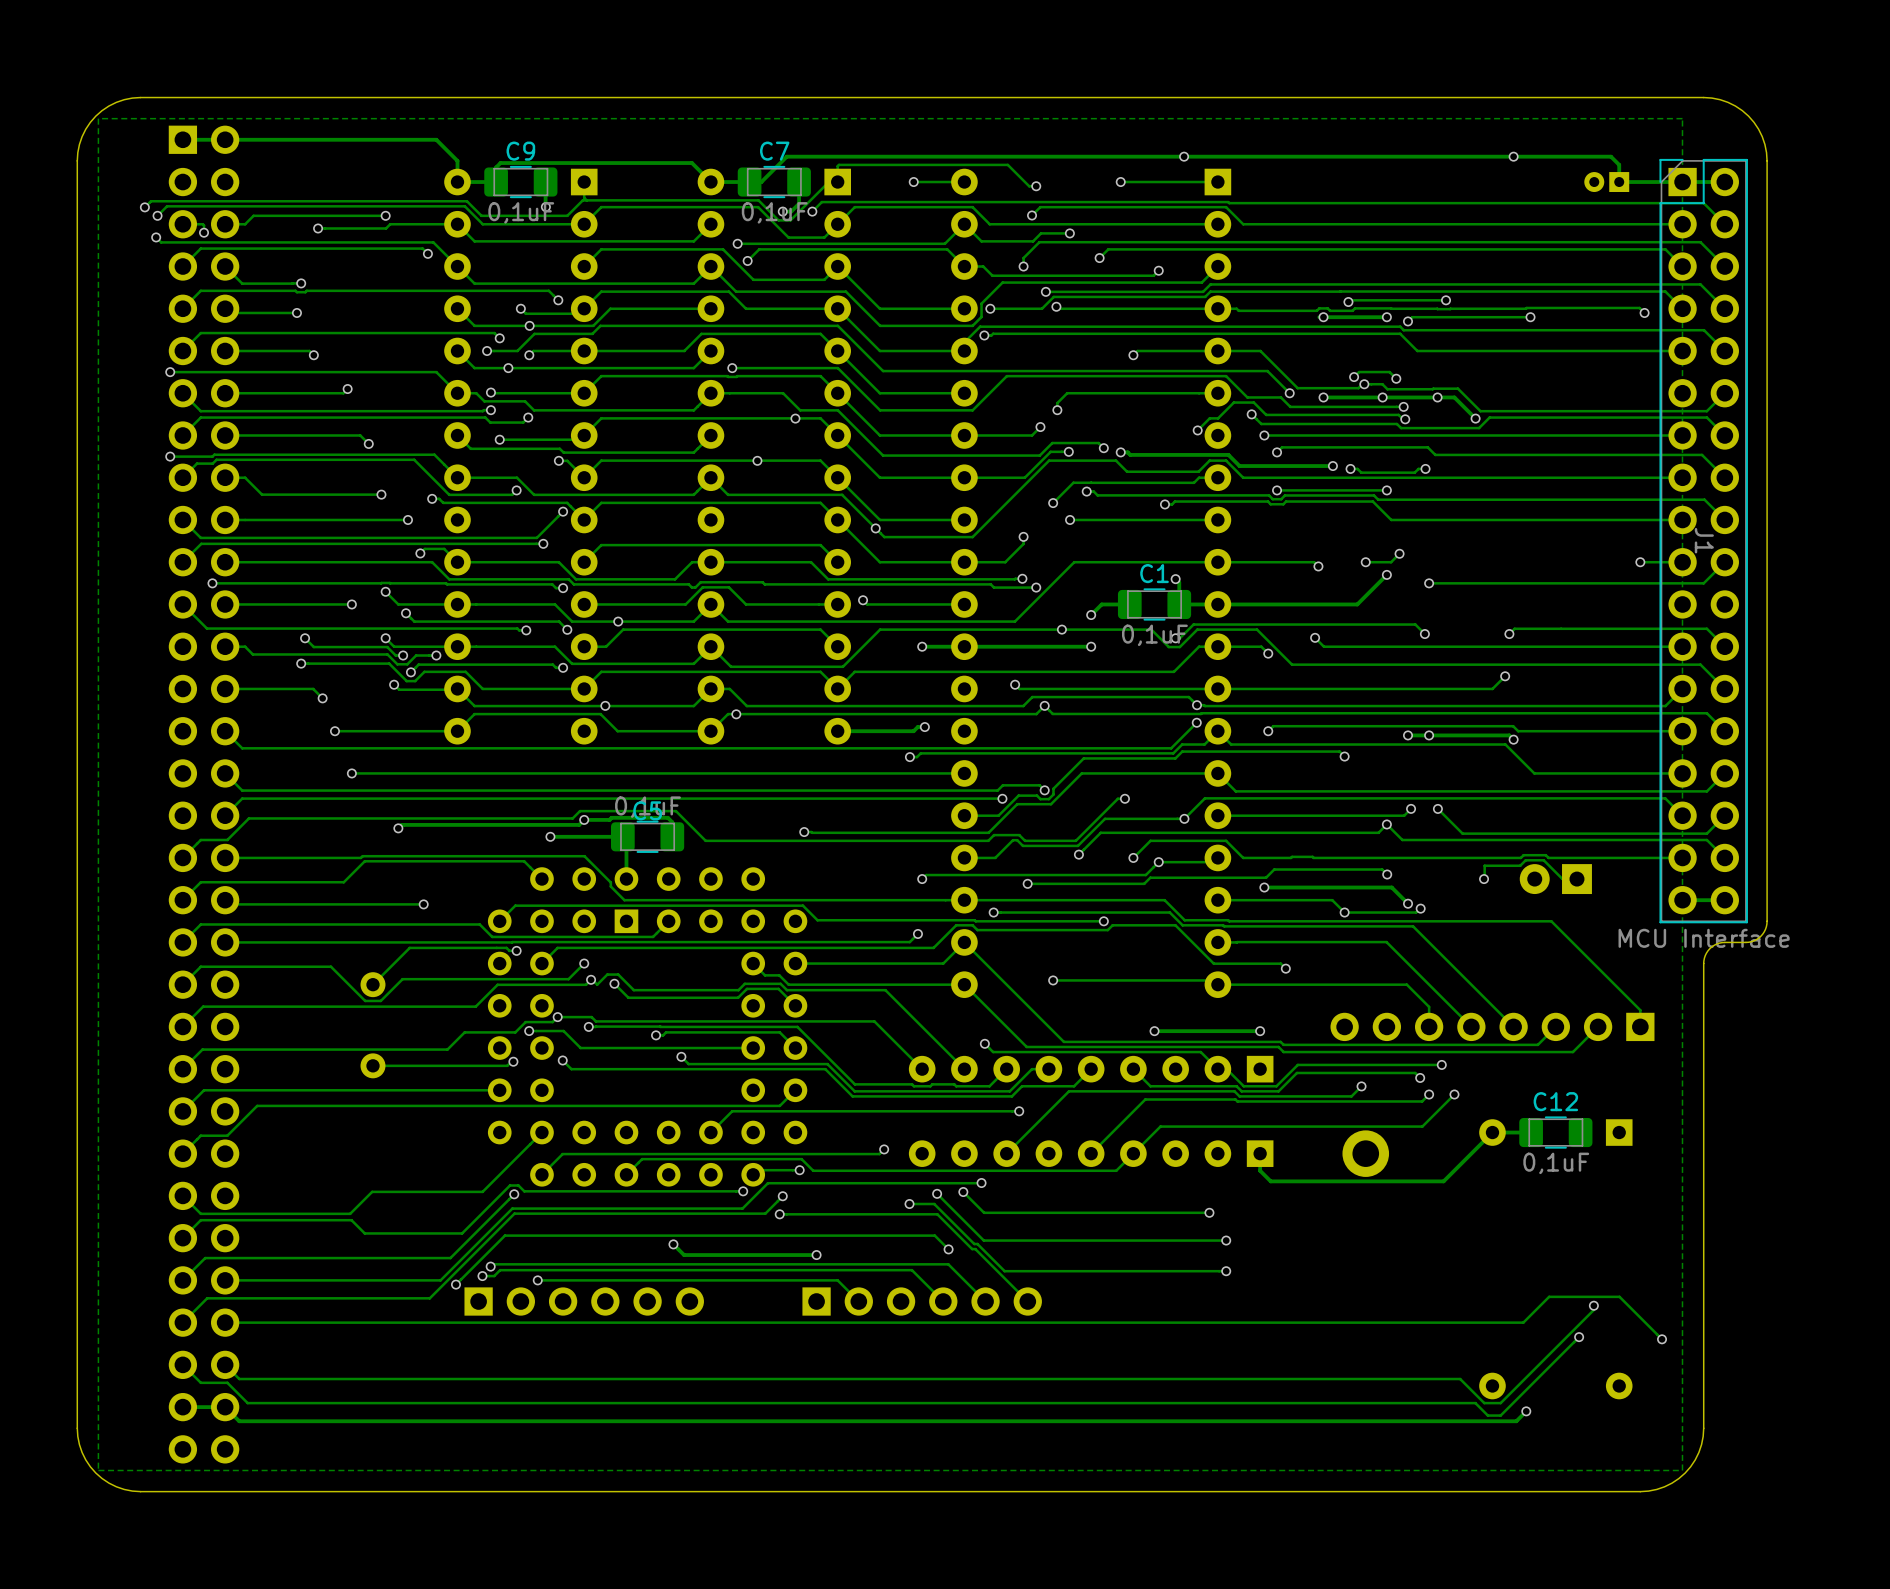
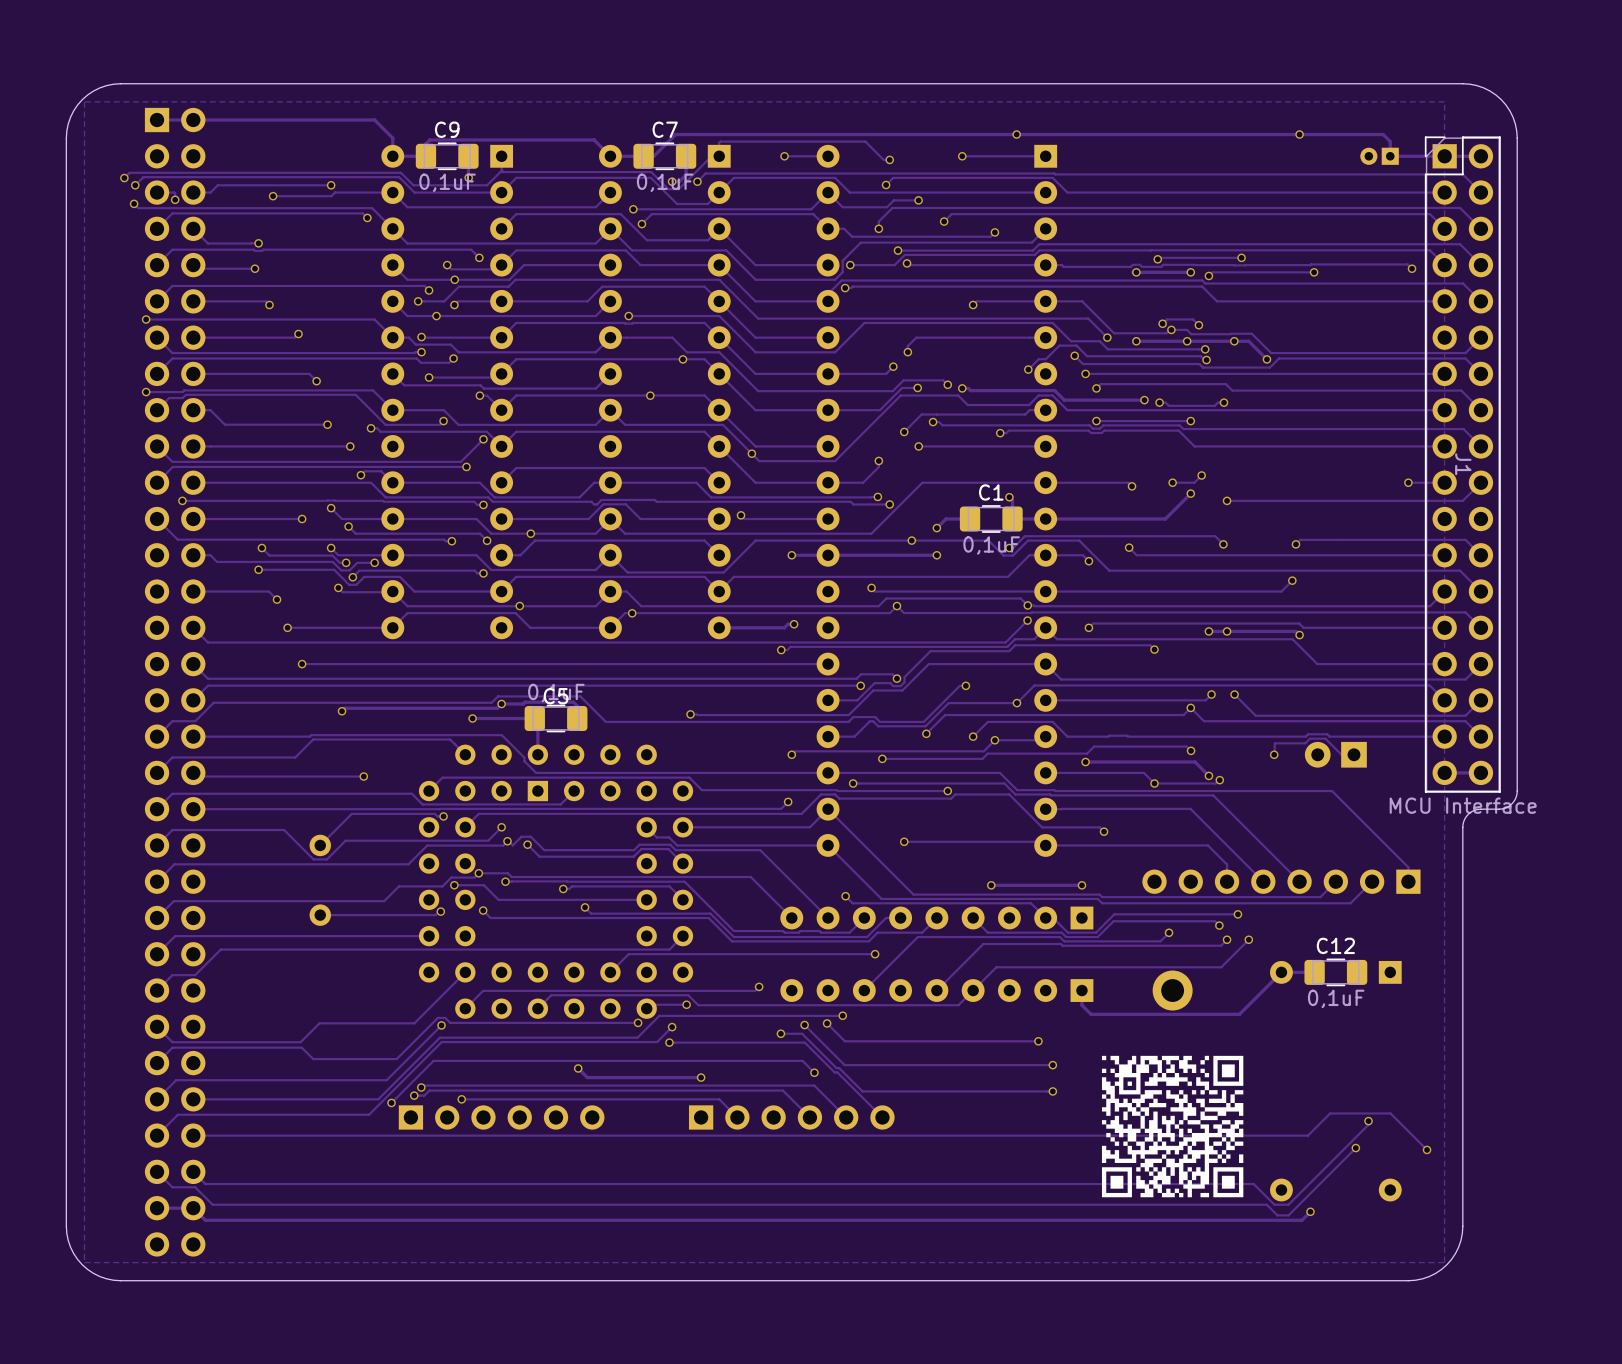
drawing: none -> [1101, 1055, 1244, 1198]

